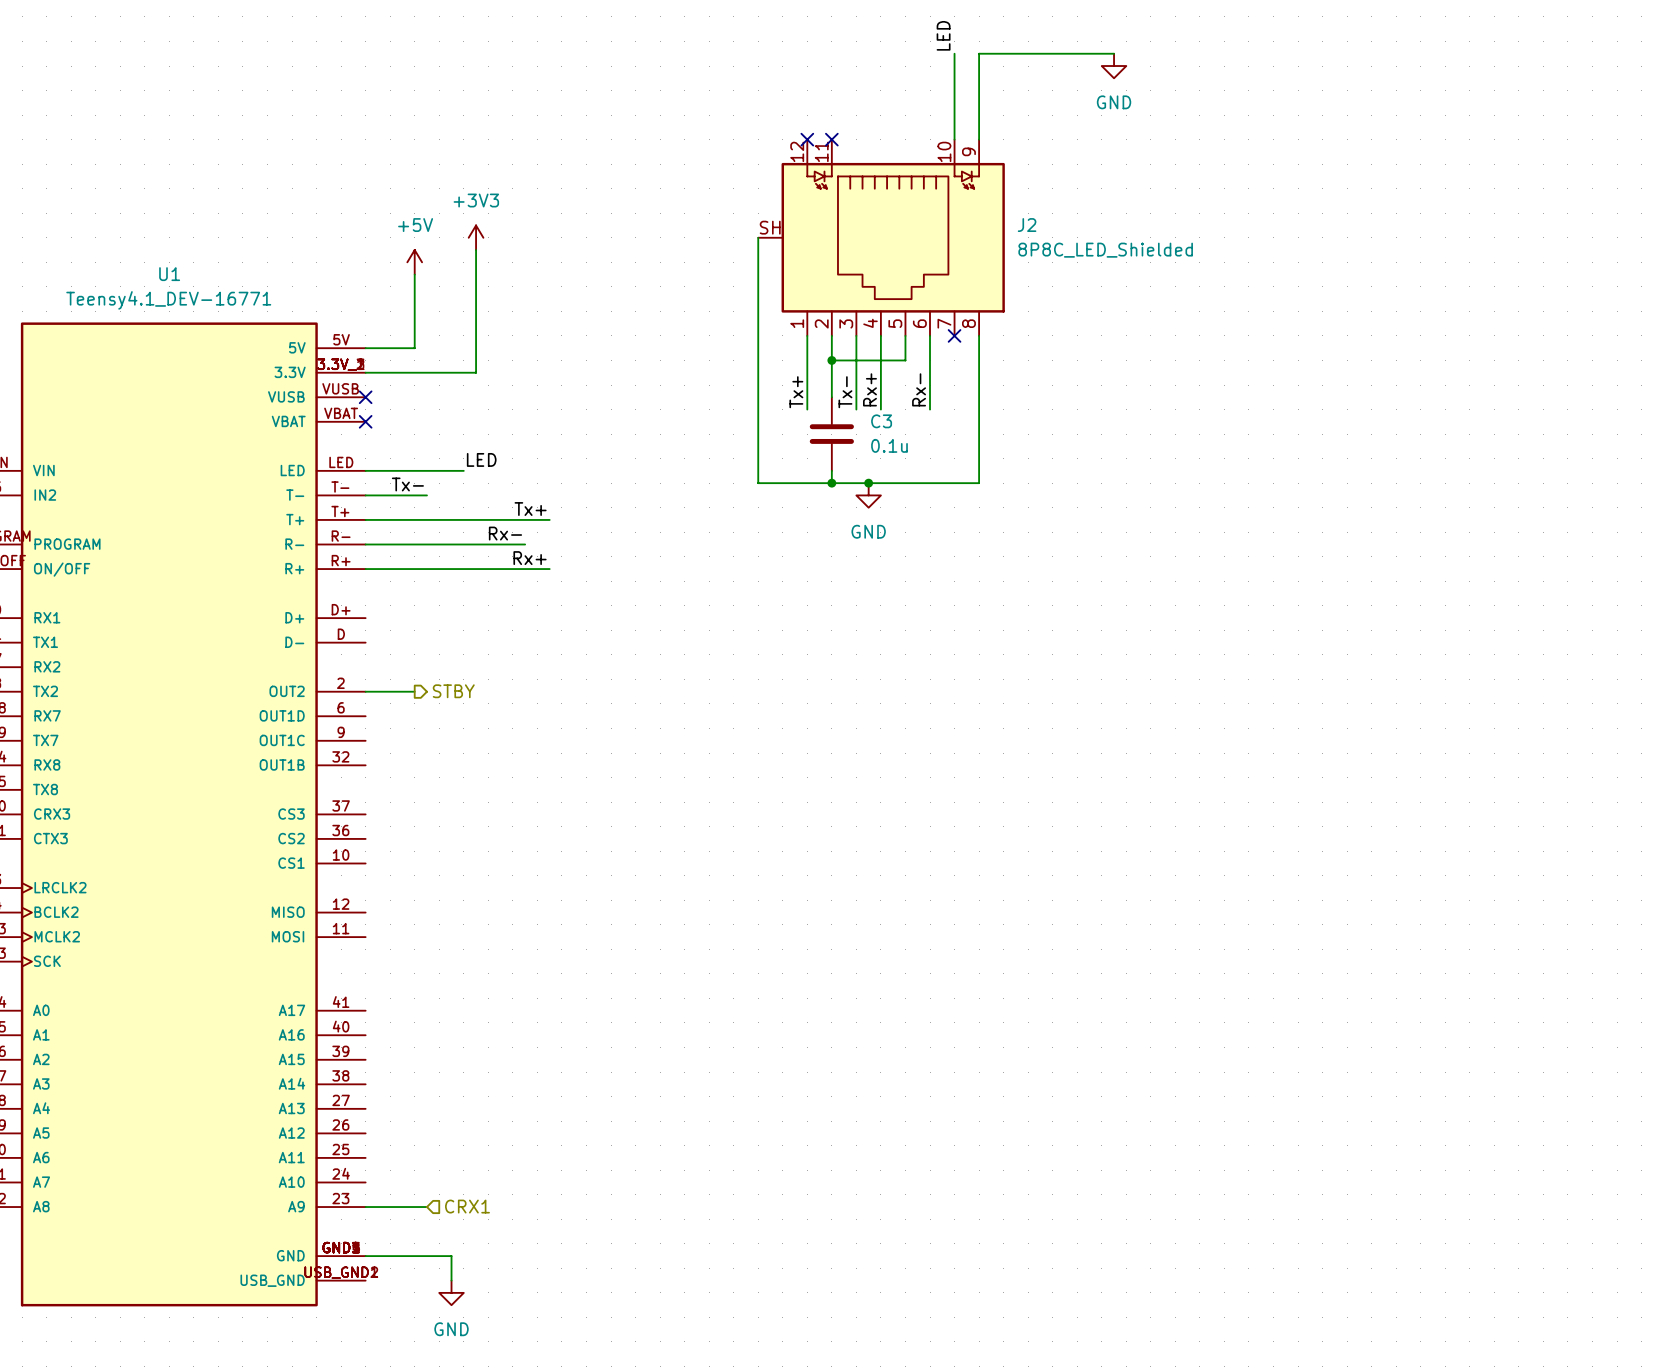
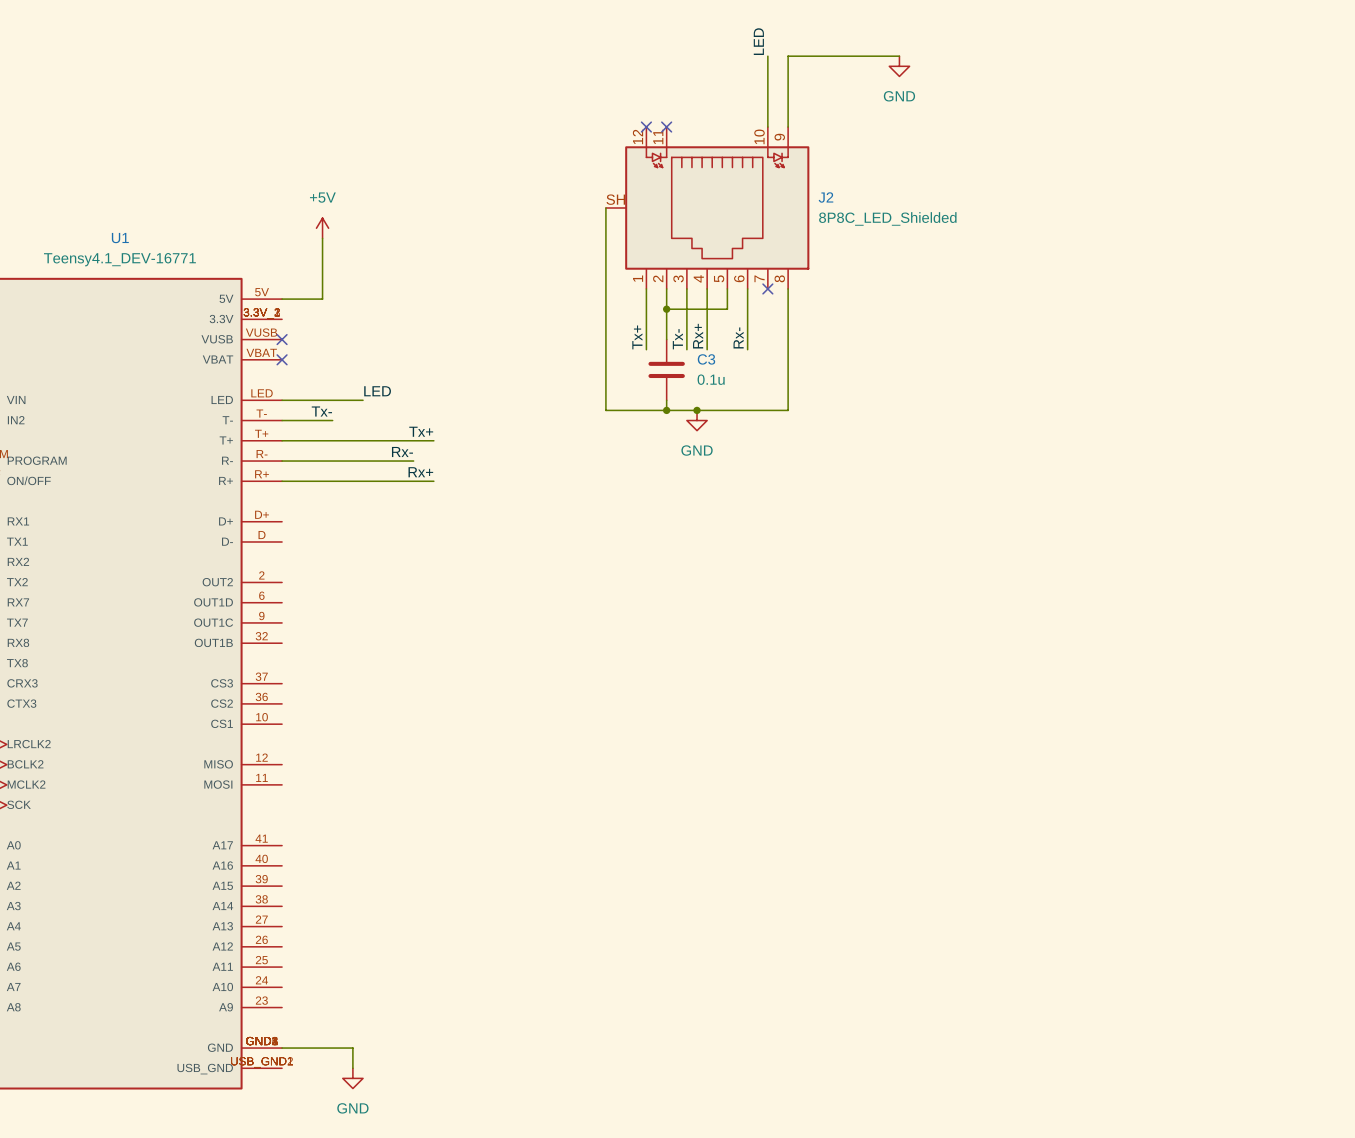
power symbol: +3V3 (476, 237) -> none
wire: (476, 250) (476, 372) (365, 372) -> none
wire: (365, 691) (414, 691) -> none
hierarchical label: STBY (453, 691) -> none
hierarchical label: CRX1 (467, 1206) -> none
wire: (365, 1207) (426, 1207) -> none

